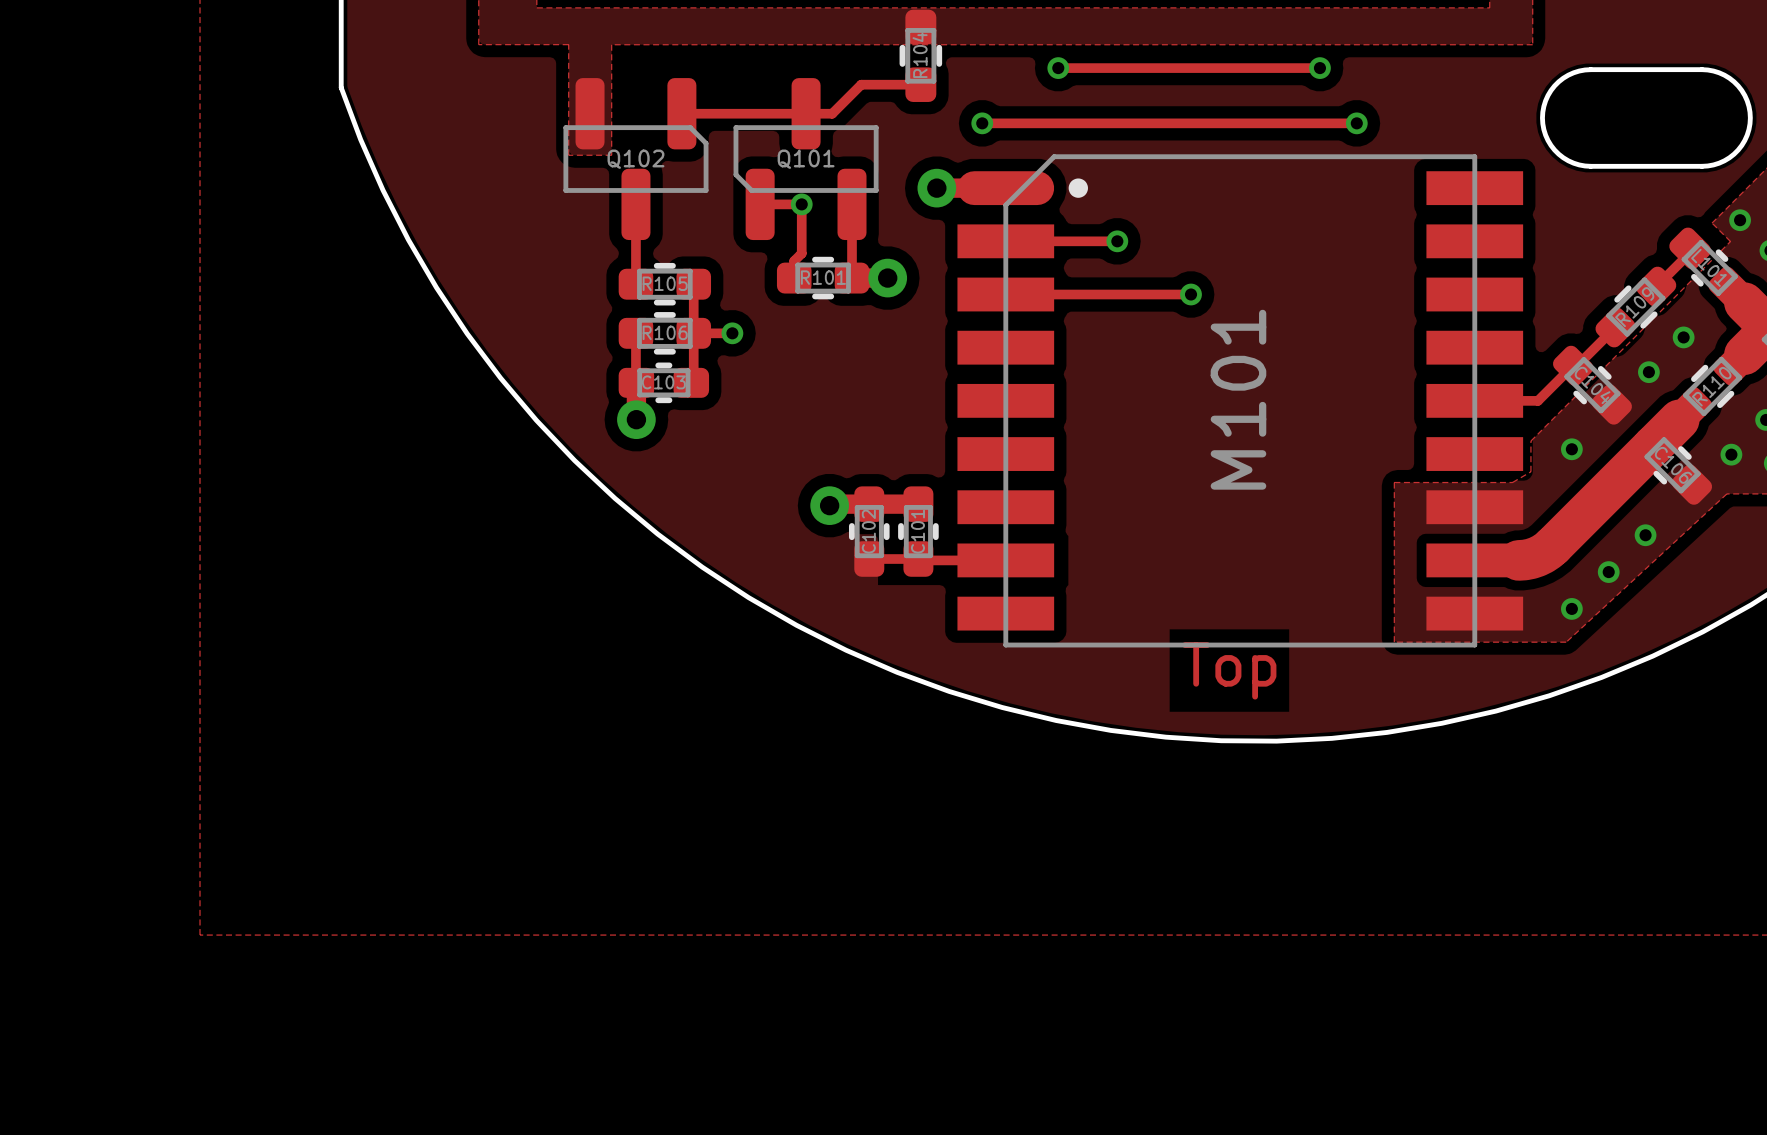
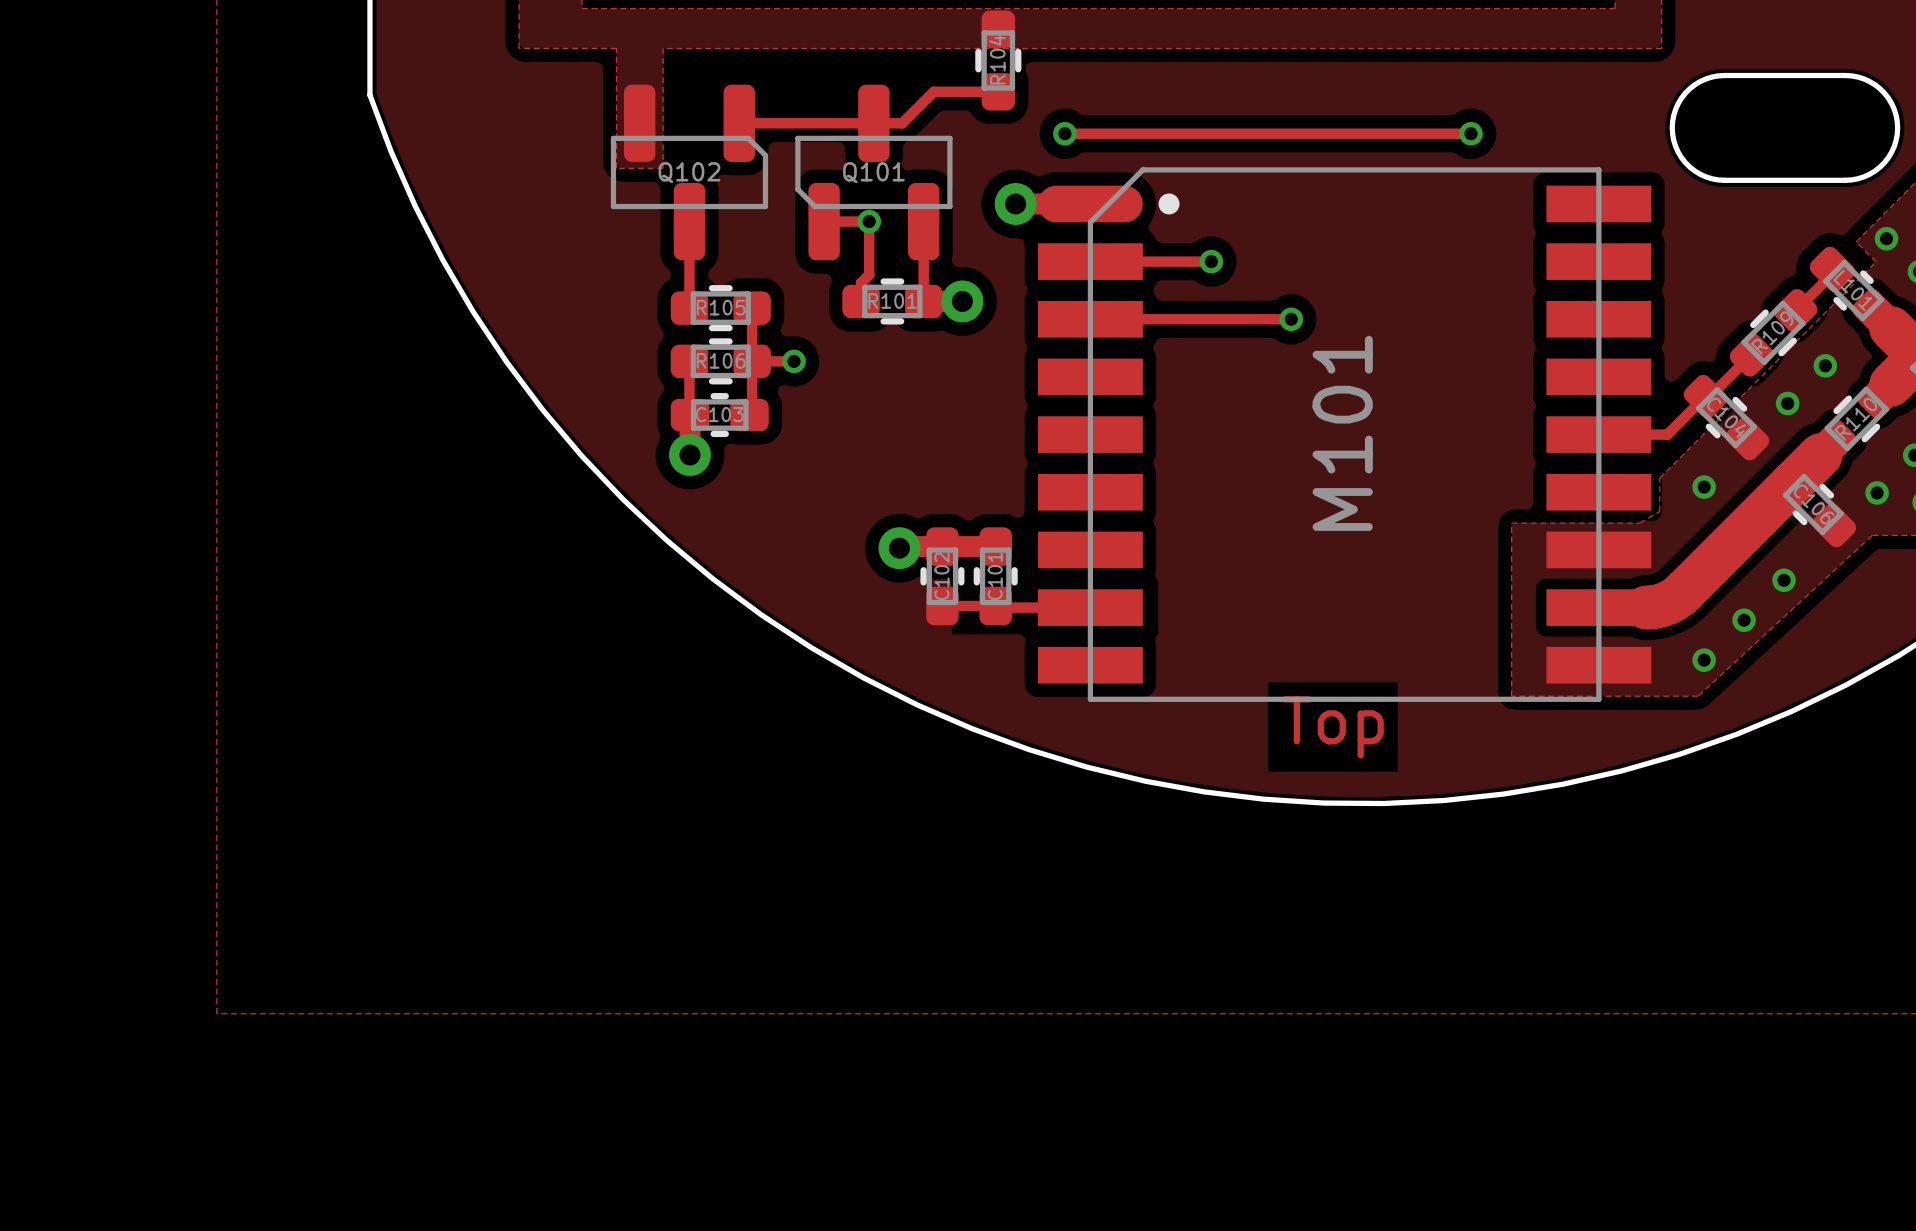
track: (1058, 68) (1319, 68) -> none
via: (1058, 68) -> none
via: (1319, 68) -> none

